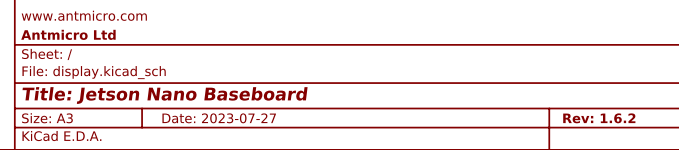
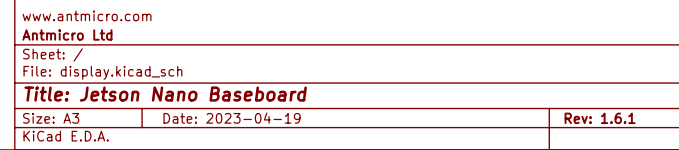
title block: Date: 2023-07-27 (219, 118) -> Date: 2023-04-19 (232, 118)
title block: Rev: 1.6.2 (599, 118) -> Rev: 1.6.1 (600, 118)

